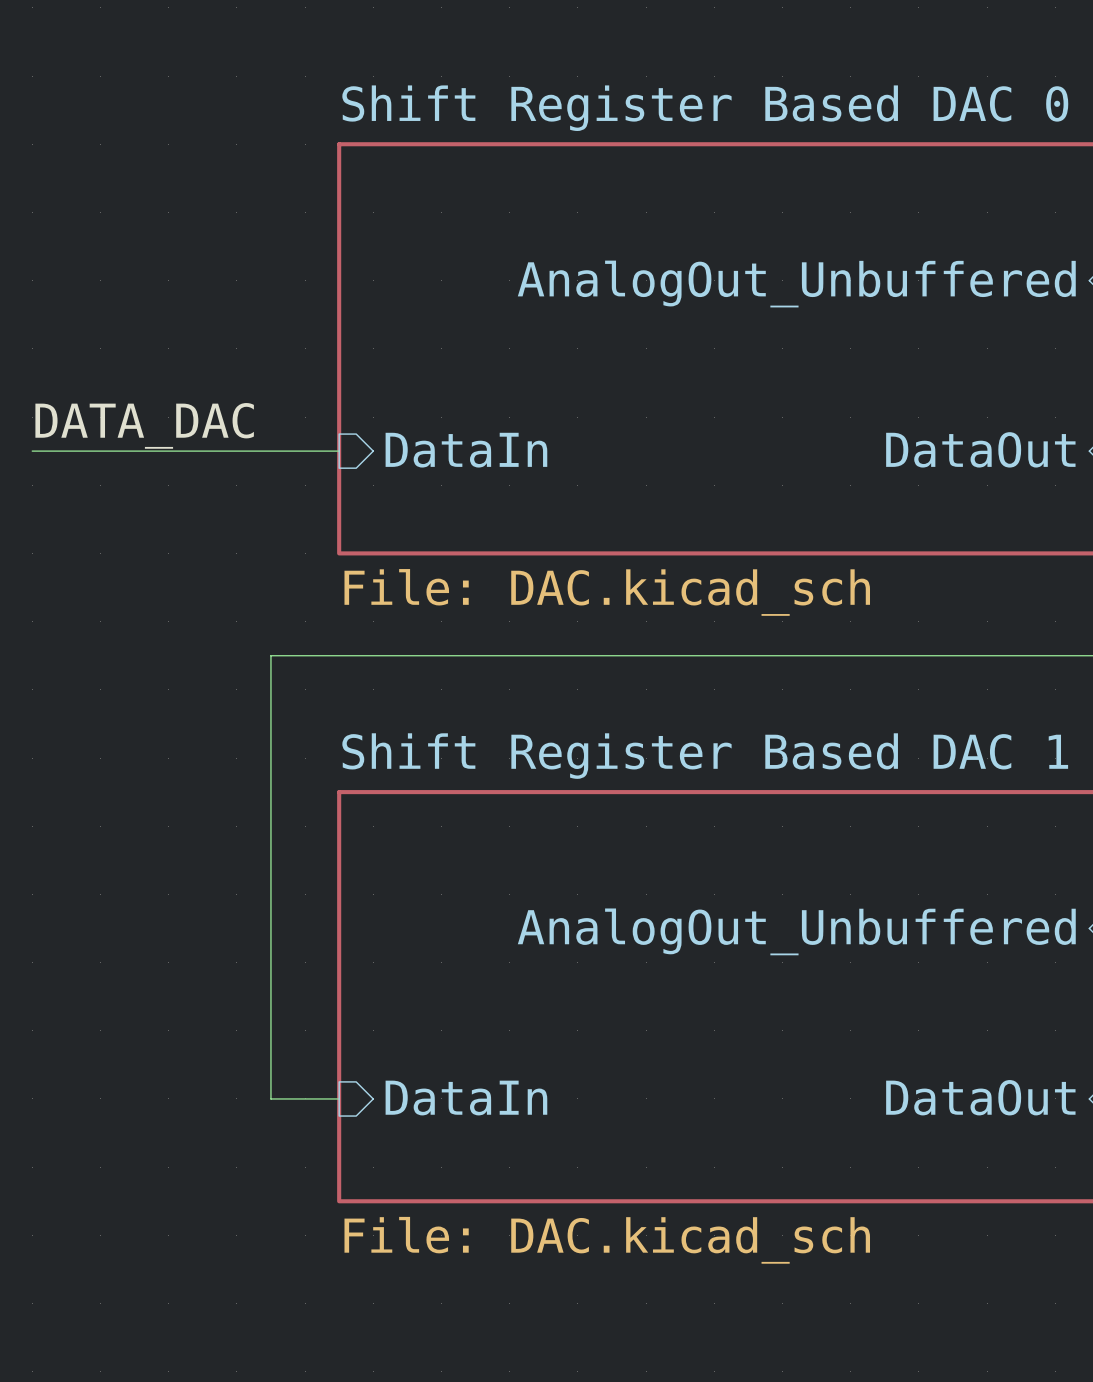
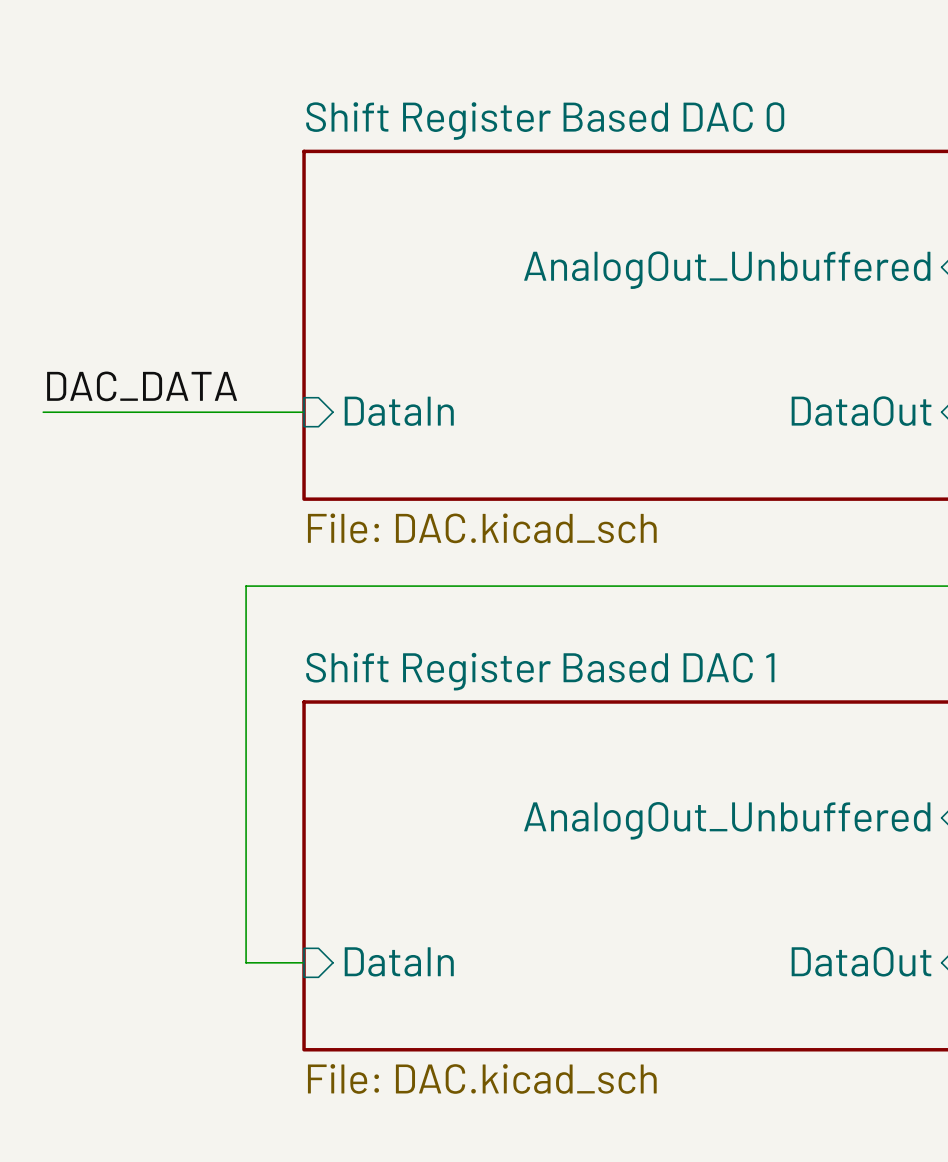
label: DATA_DAC (144, 425) -> DAC_DATA (142, 386)

